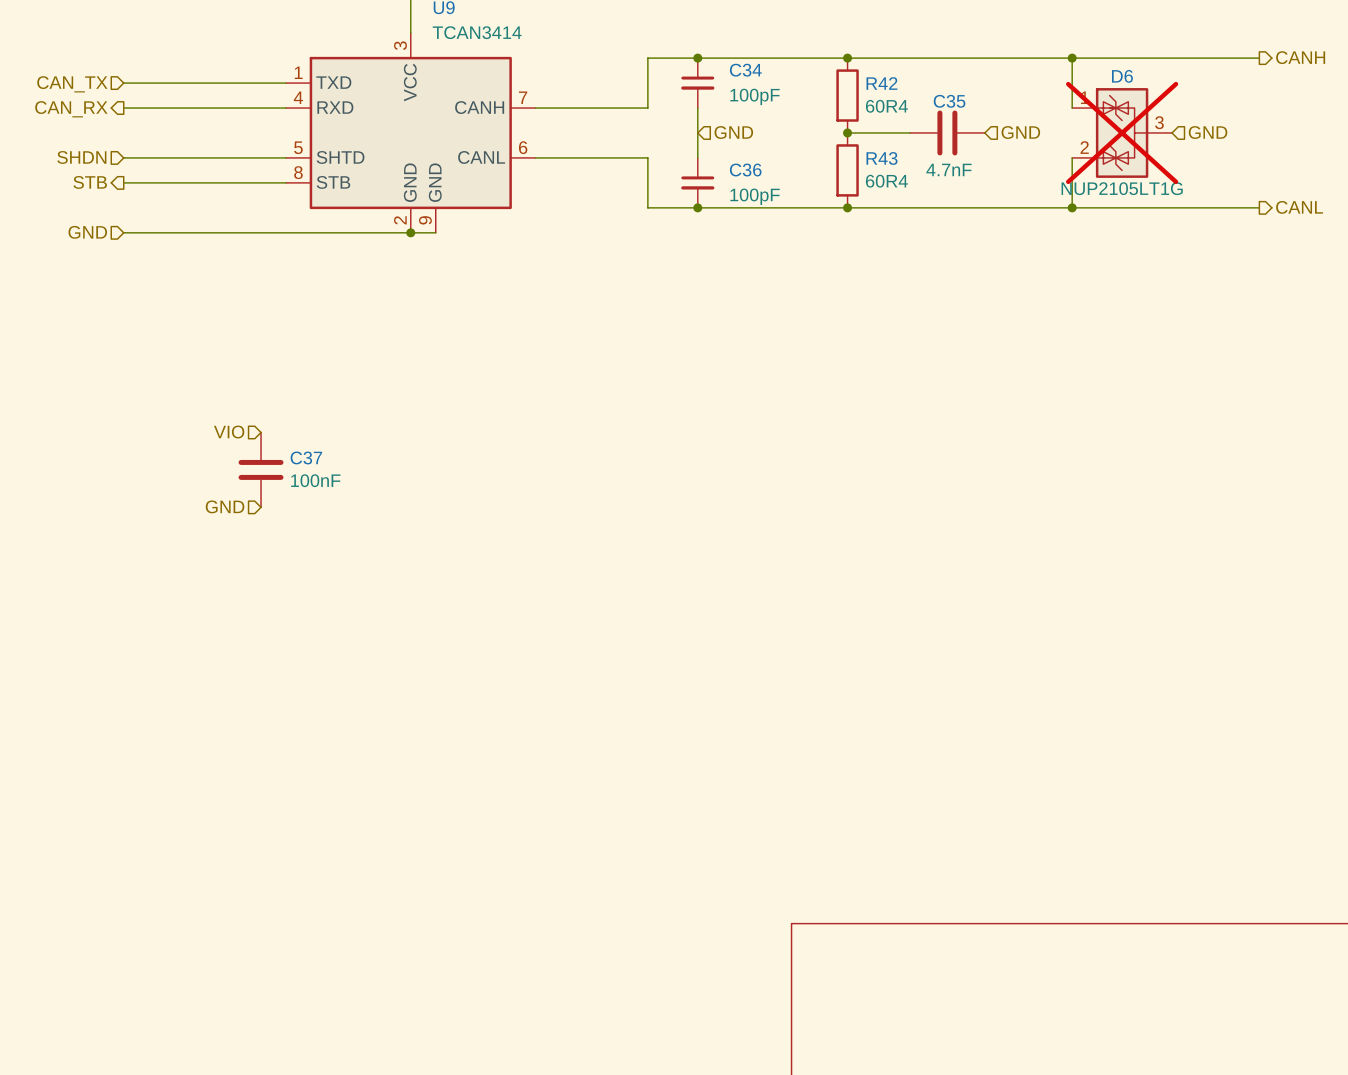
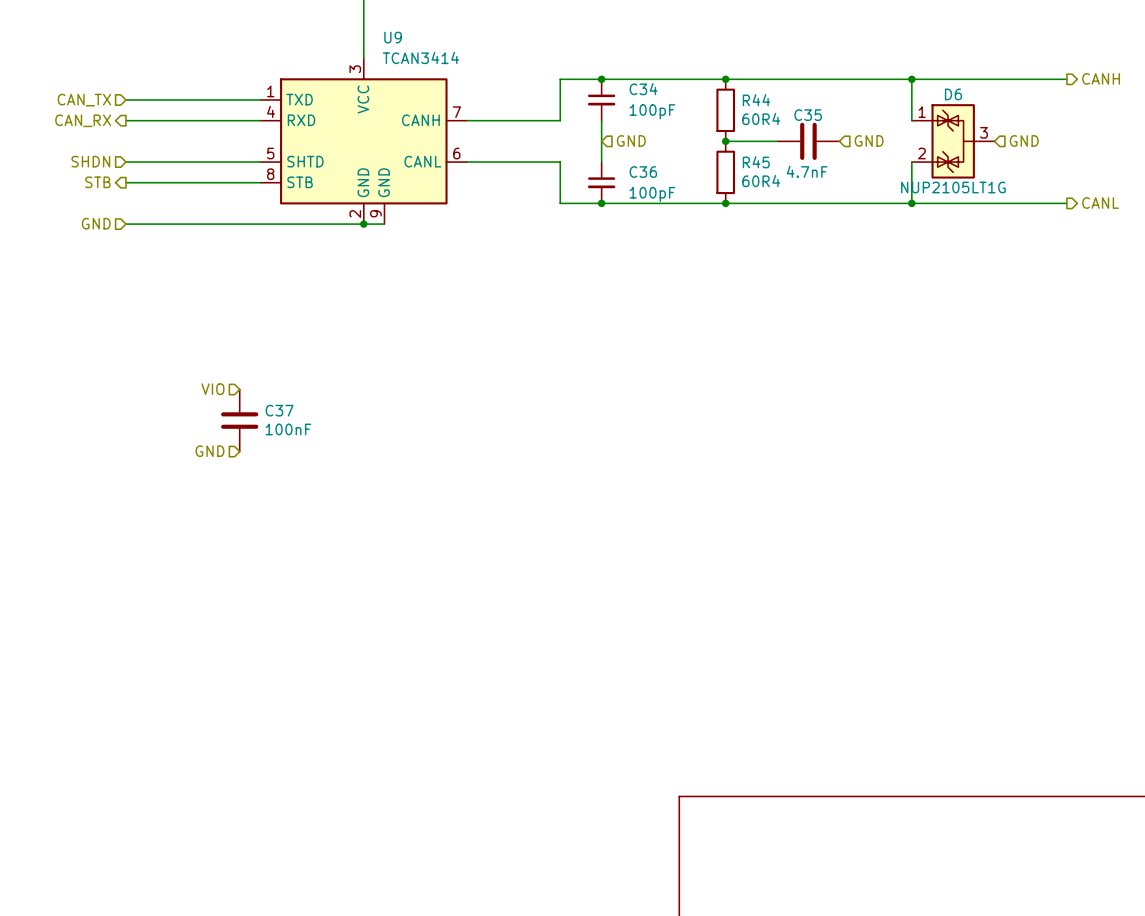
R42 name: R42 (881, 83) -> R44 (756, 100)
D6 do-not-place cross: (1122, 132) -> none
R43 name: R43 (882, 158) -> R45 (756, 162)

